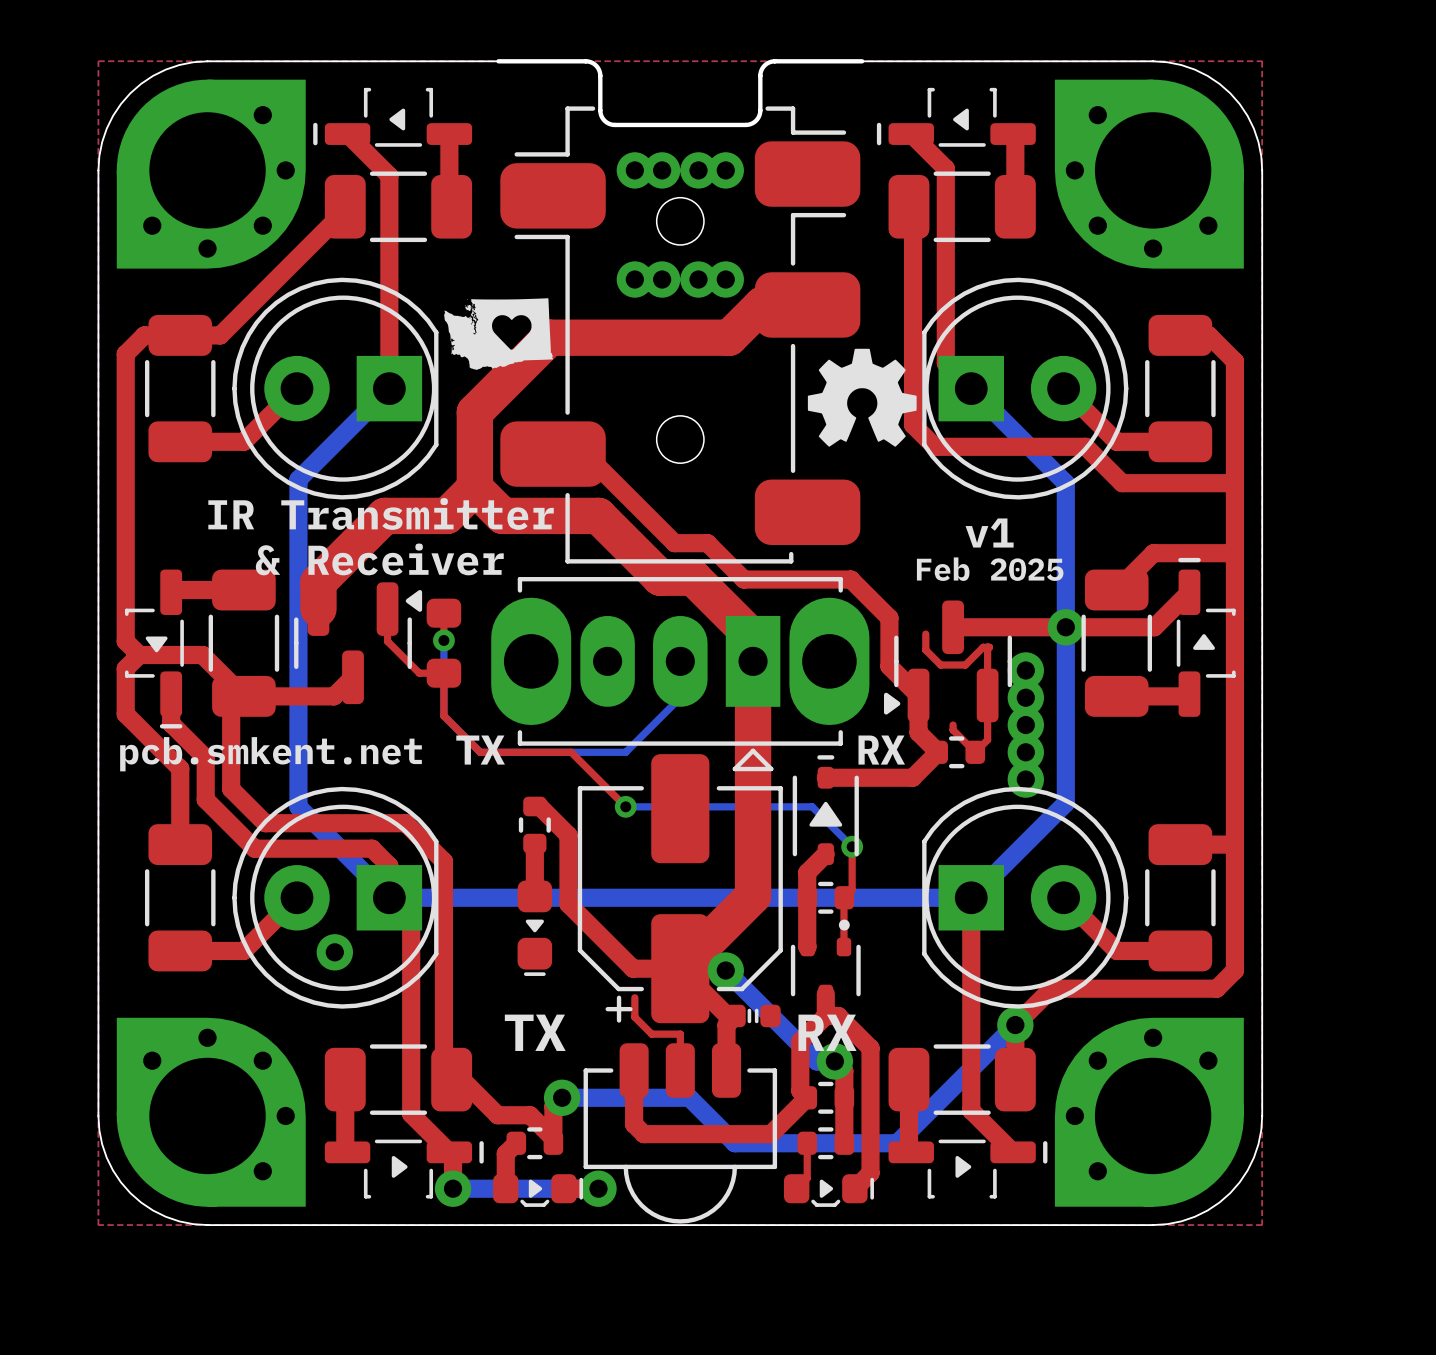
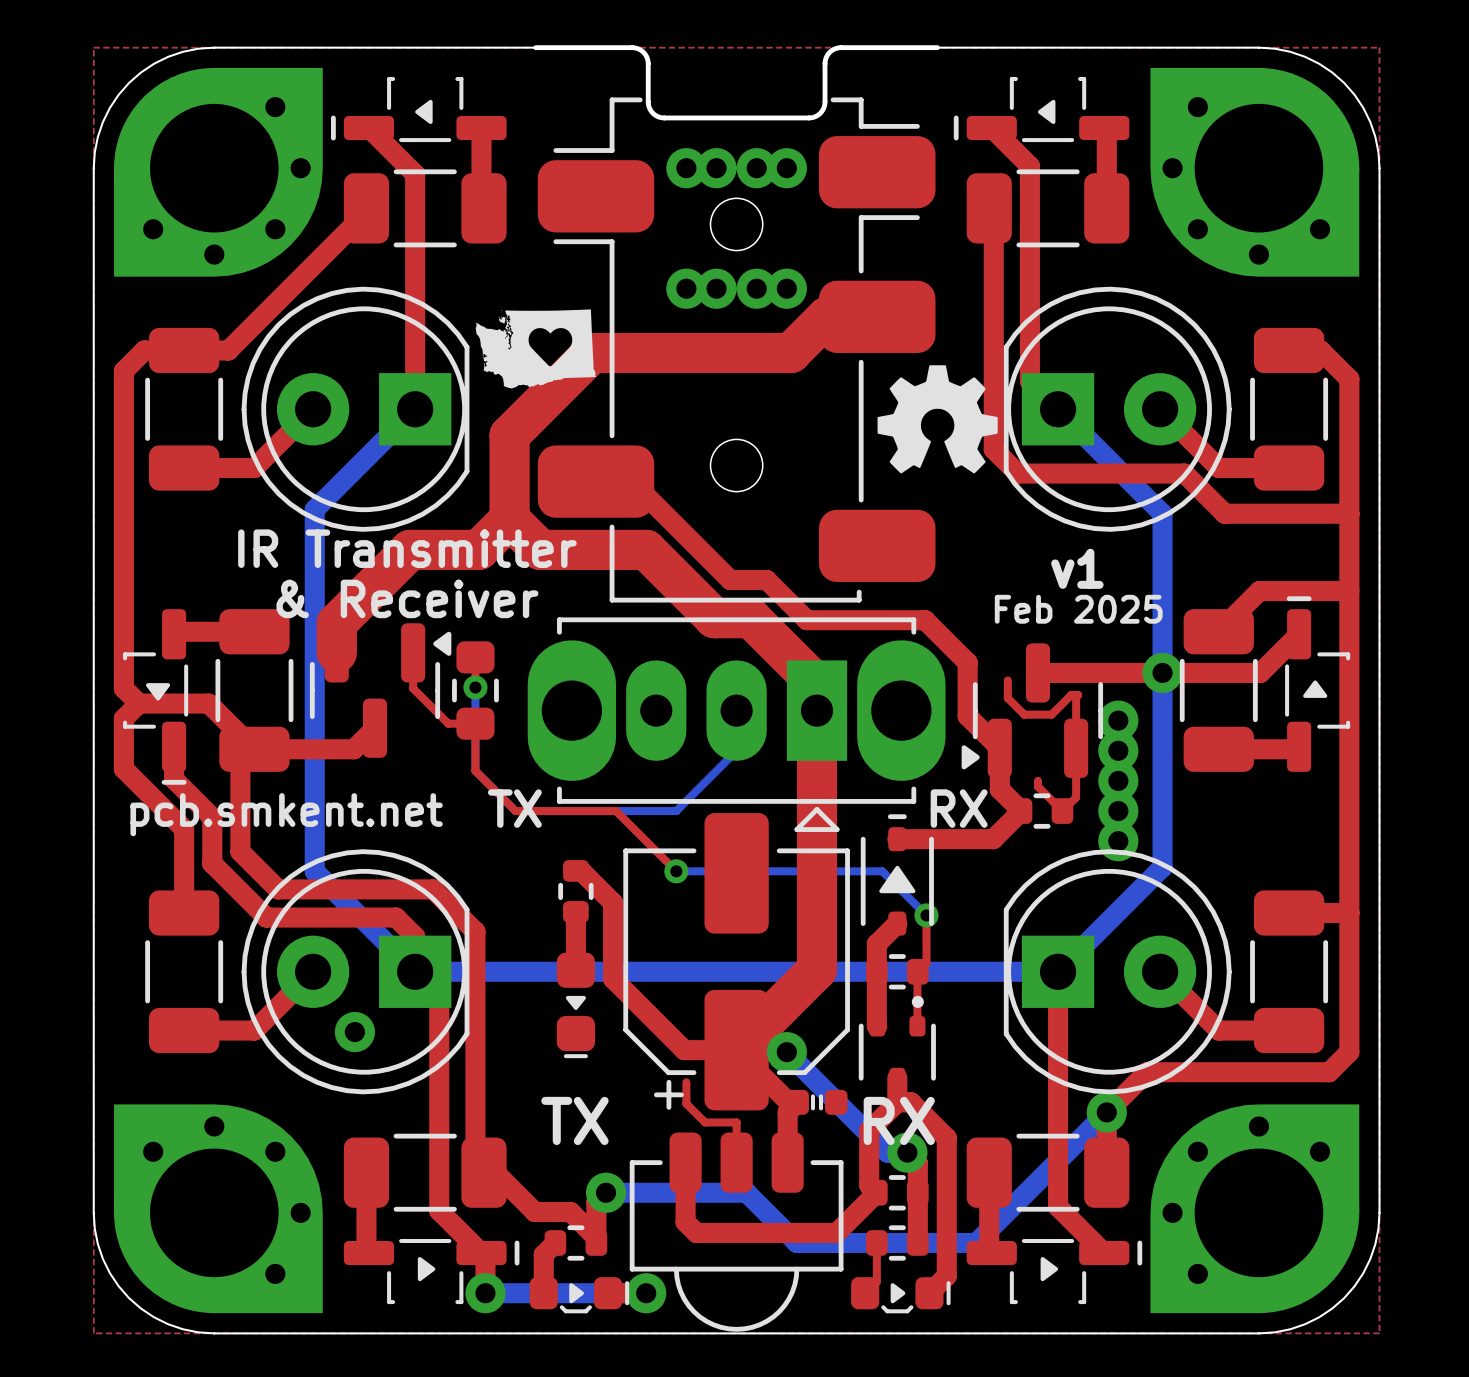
part footprint: [426, 598, 462, 688] -> [452, 641, 499, 740]

